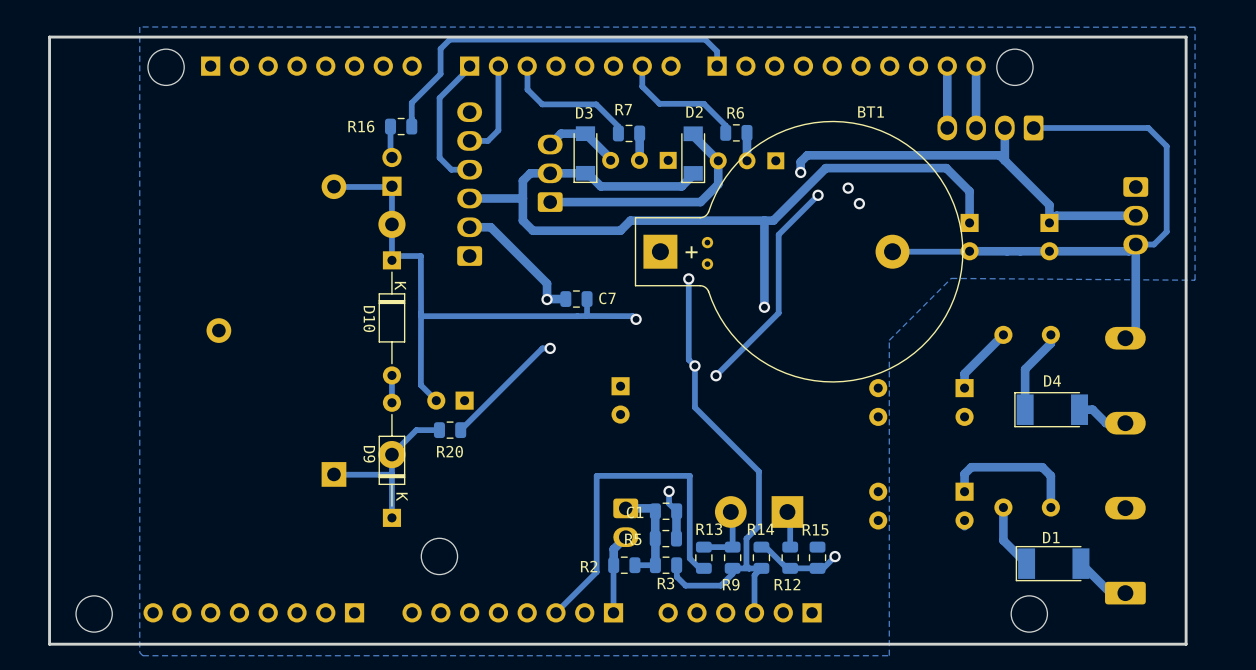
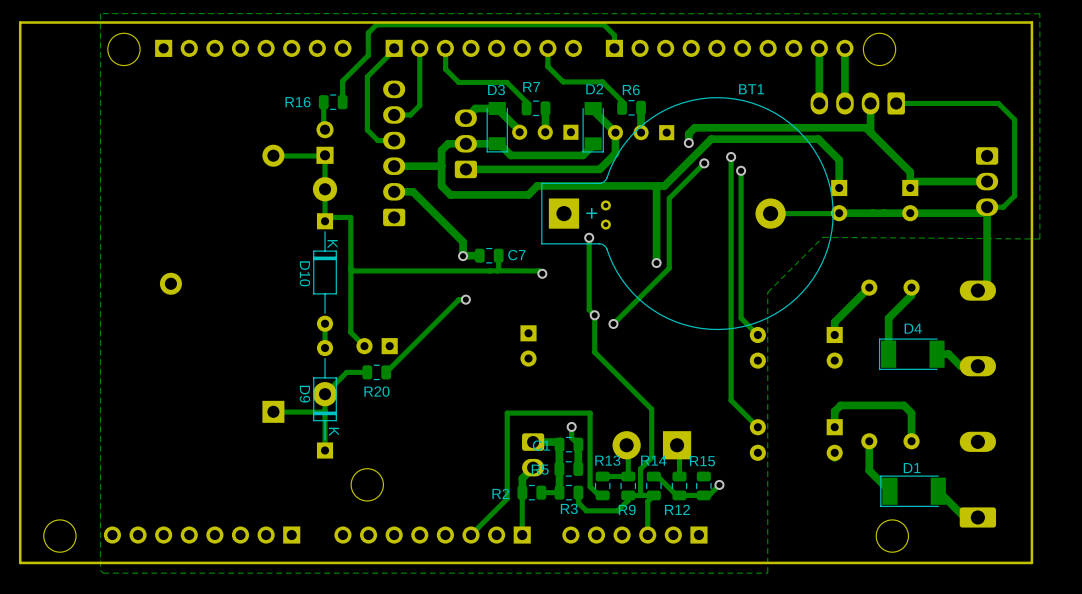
track: none -> (731, 156) (731, 400) (757, 427)
track: none -> (741, 170) (741, 318) (757, 334)

